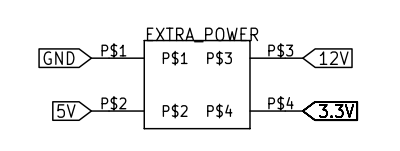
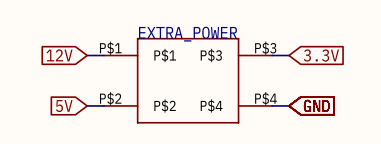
global label: GND (59, 58) -> 12V (59, 55)
global label: 12V (334, 58) -> 3.3V (321, 55)
global label: 3.3V (336, 111) -> GND (316, 105)

